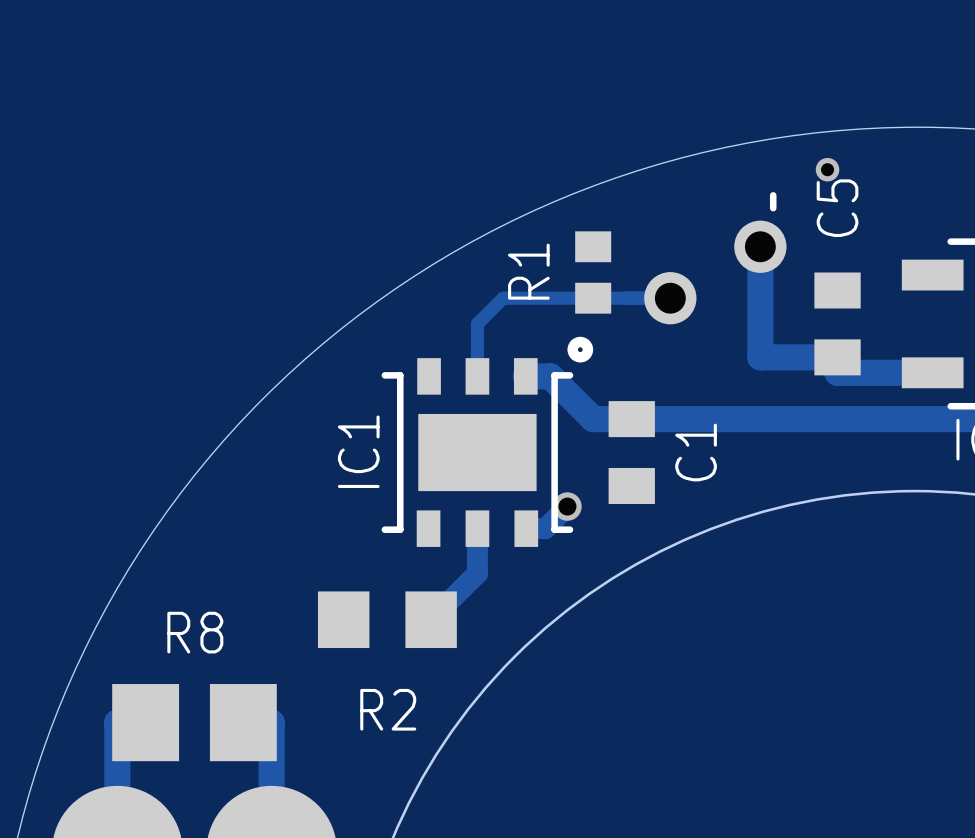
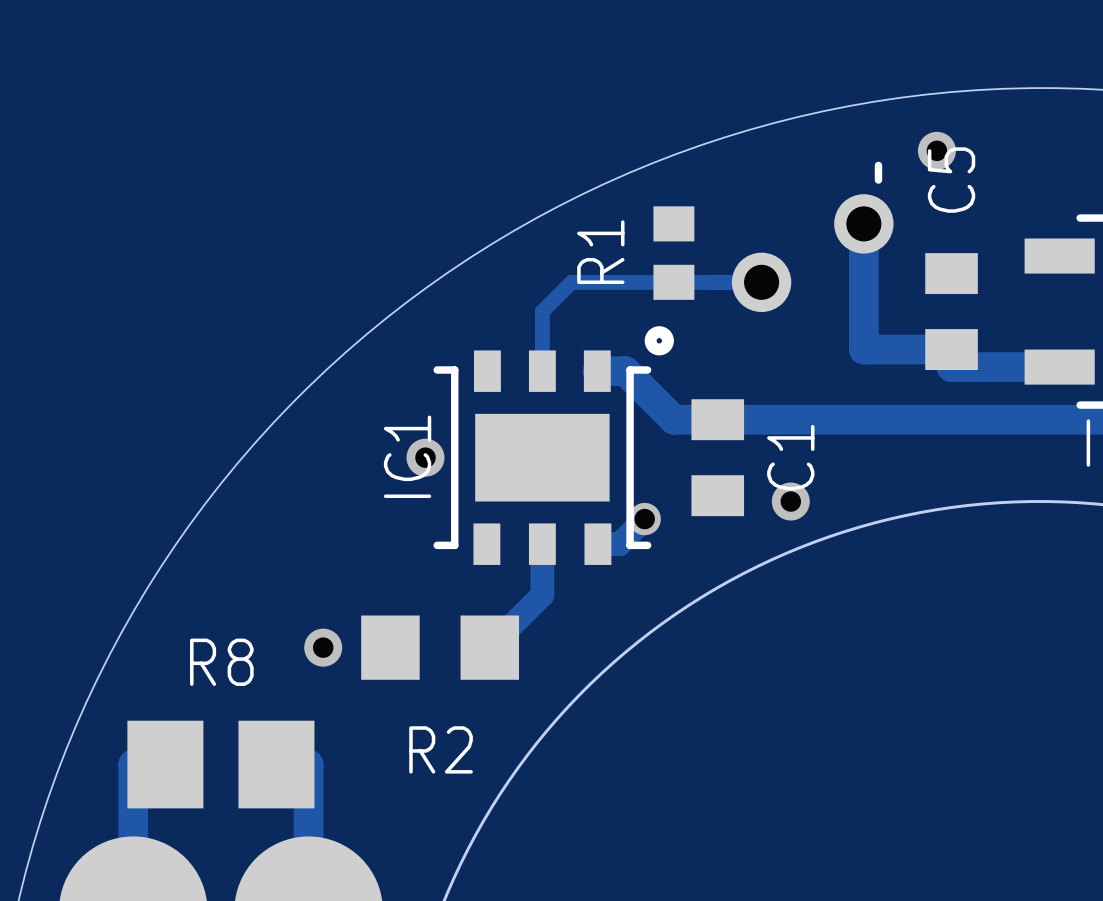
via size: [815, 157, 840, 182] -> [917, 131, 956, 170]
via: none -> (425, 457)
via: none -> (790, 501)
via: none -> (323, 647)

